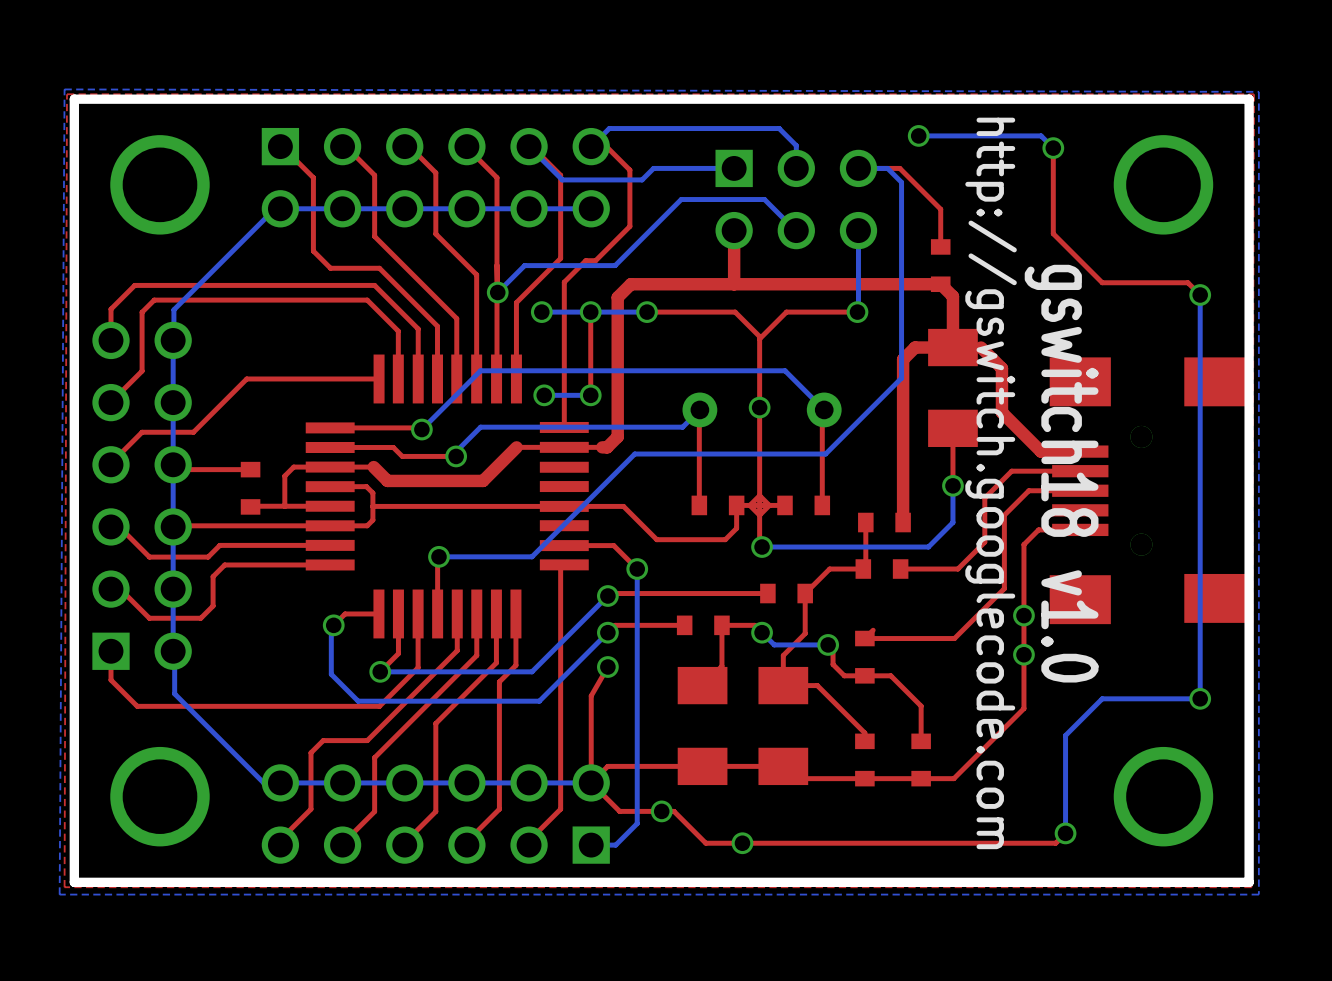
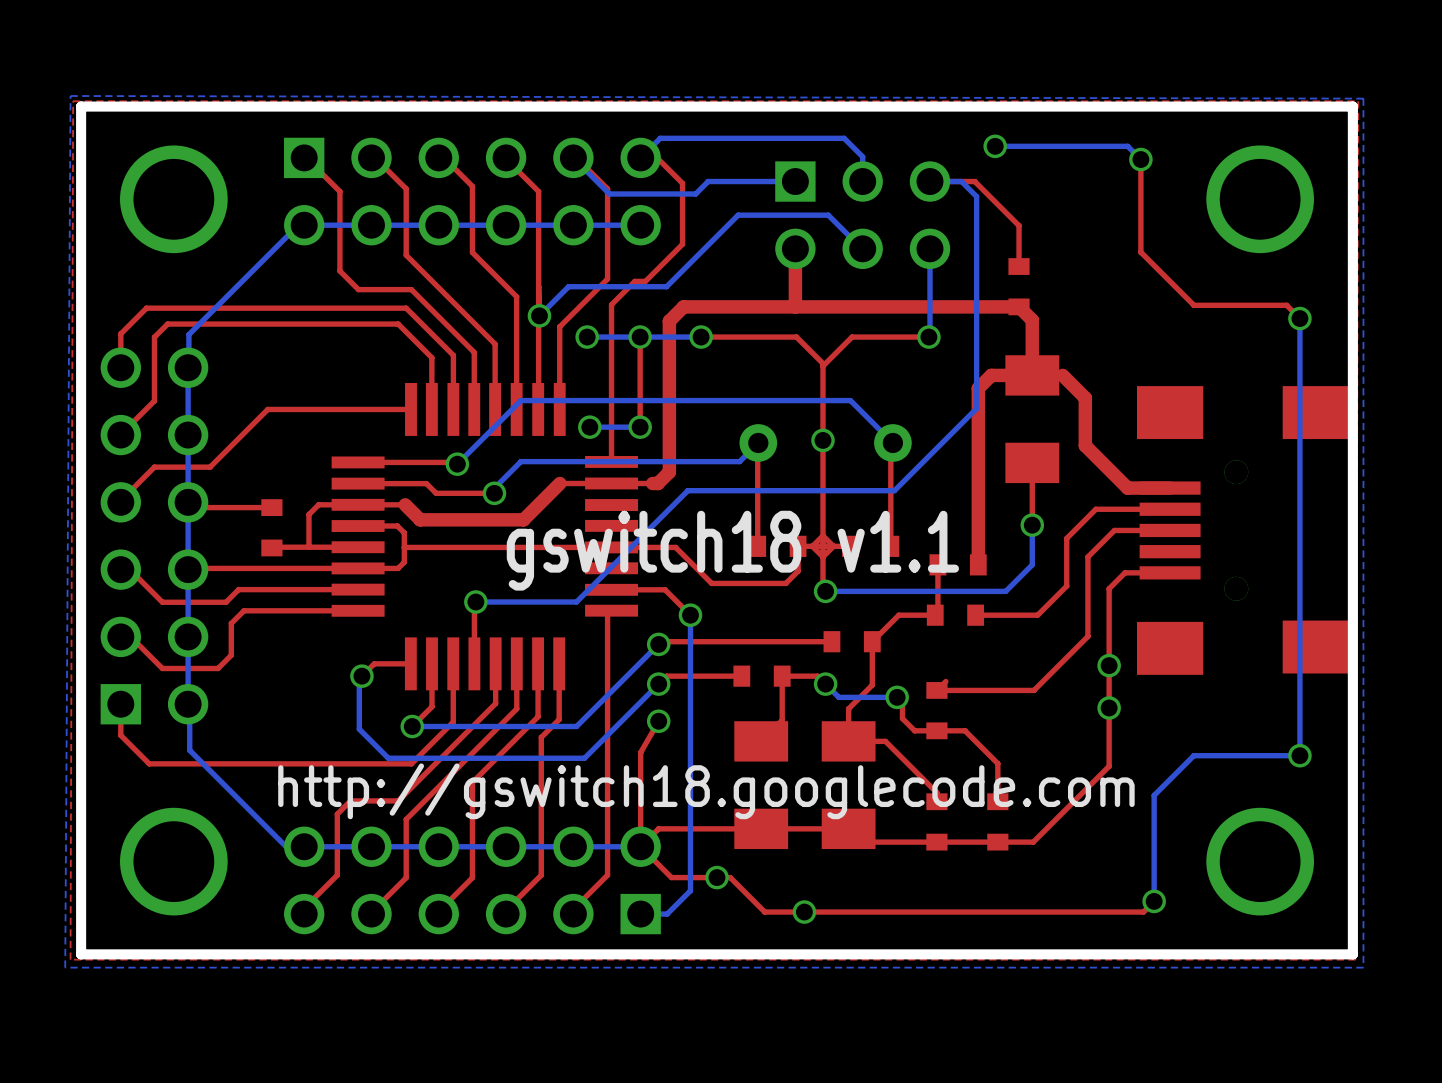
text: gswitch18 v1.0 (1061, 473) -> none
text: http://gswitch.googlecode.com (991, 483) -> http://gswitch18.googlecode.com (706, 791)
text: none -> gswitch18 v1.1 (732, 550)

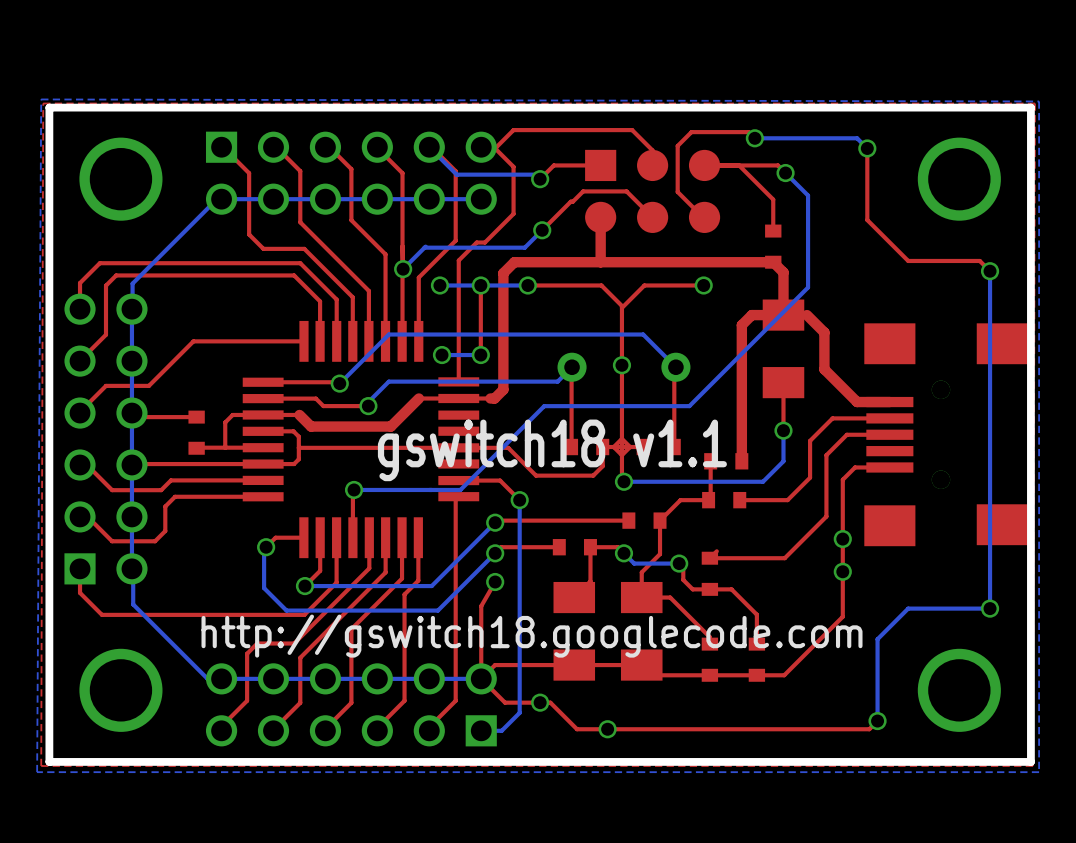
top track: none -> (754, 138) (748, 132) (691, 132) (677, 145) (677, 192) (704, 217)
bottom track: (640, 157) (660, 138) (844, 138) (862, 156) (862, 181) -> none
top track: none -> (493, 147) (496, 147) (513, 130) (632, 130) (652, 150) (652, 165)
part footprint: [775, 161, 951, 270] -> [585, 149, 721, 233]
top track: none -> (600, 165) (553, 165) (540, 179)
bottom track: (795, 181) (708, 181) (695, 193) (609, 193) -> (540, 179) (535, 174) (456, 174)
bottom track: (929, 181) (961, 181) (976, 196) (976, 408) (894, 490) (687, 490) (576, 602) -> (785, 173) (808, 195) (808, 287) (689, 406) (544, 406) (460, 489) (431, 489)
top track: none -> (739, 165) (777, 165) (785, 173)
via: none -> (785, 173)
via: none -> (540, 179)
top track: none -> (652, 217) (626, 191) (583, 191) (542, 230)
bottom track: (862, 248) (828, 215) (738, 215) (666, 286) (568, 286) -> none
bottom track: (929, 248) (929, 335) -> none
bottom track: none -> (542, 230) (524, 247) (424, 247)
via: none -> (542, 230)

